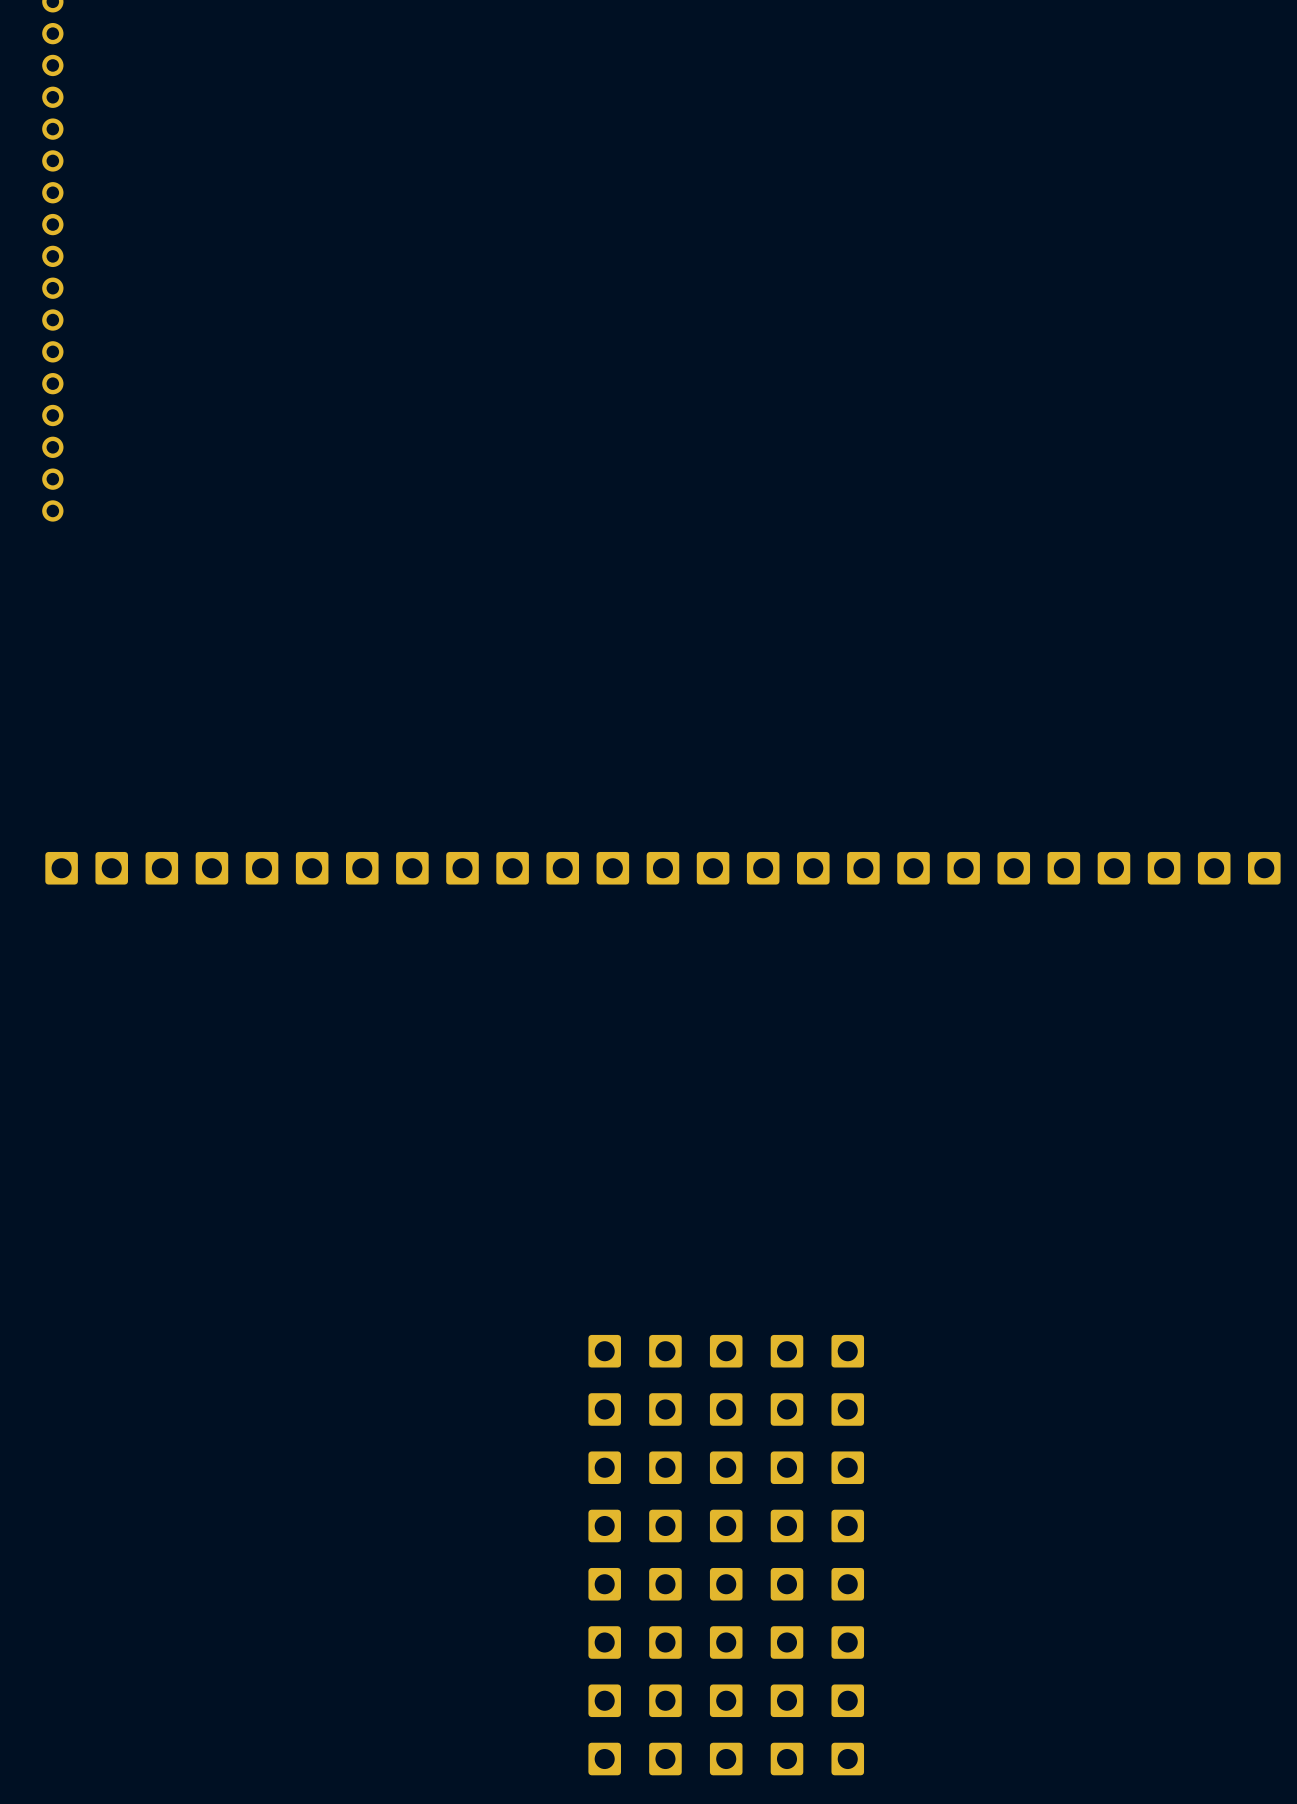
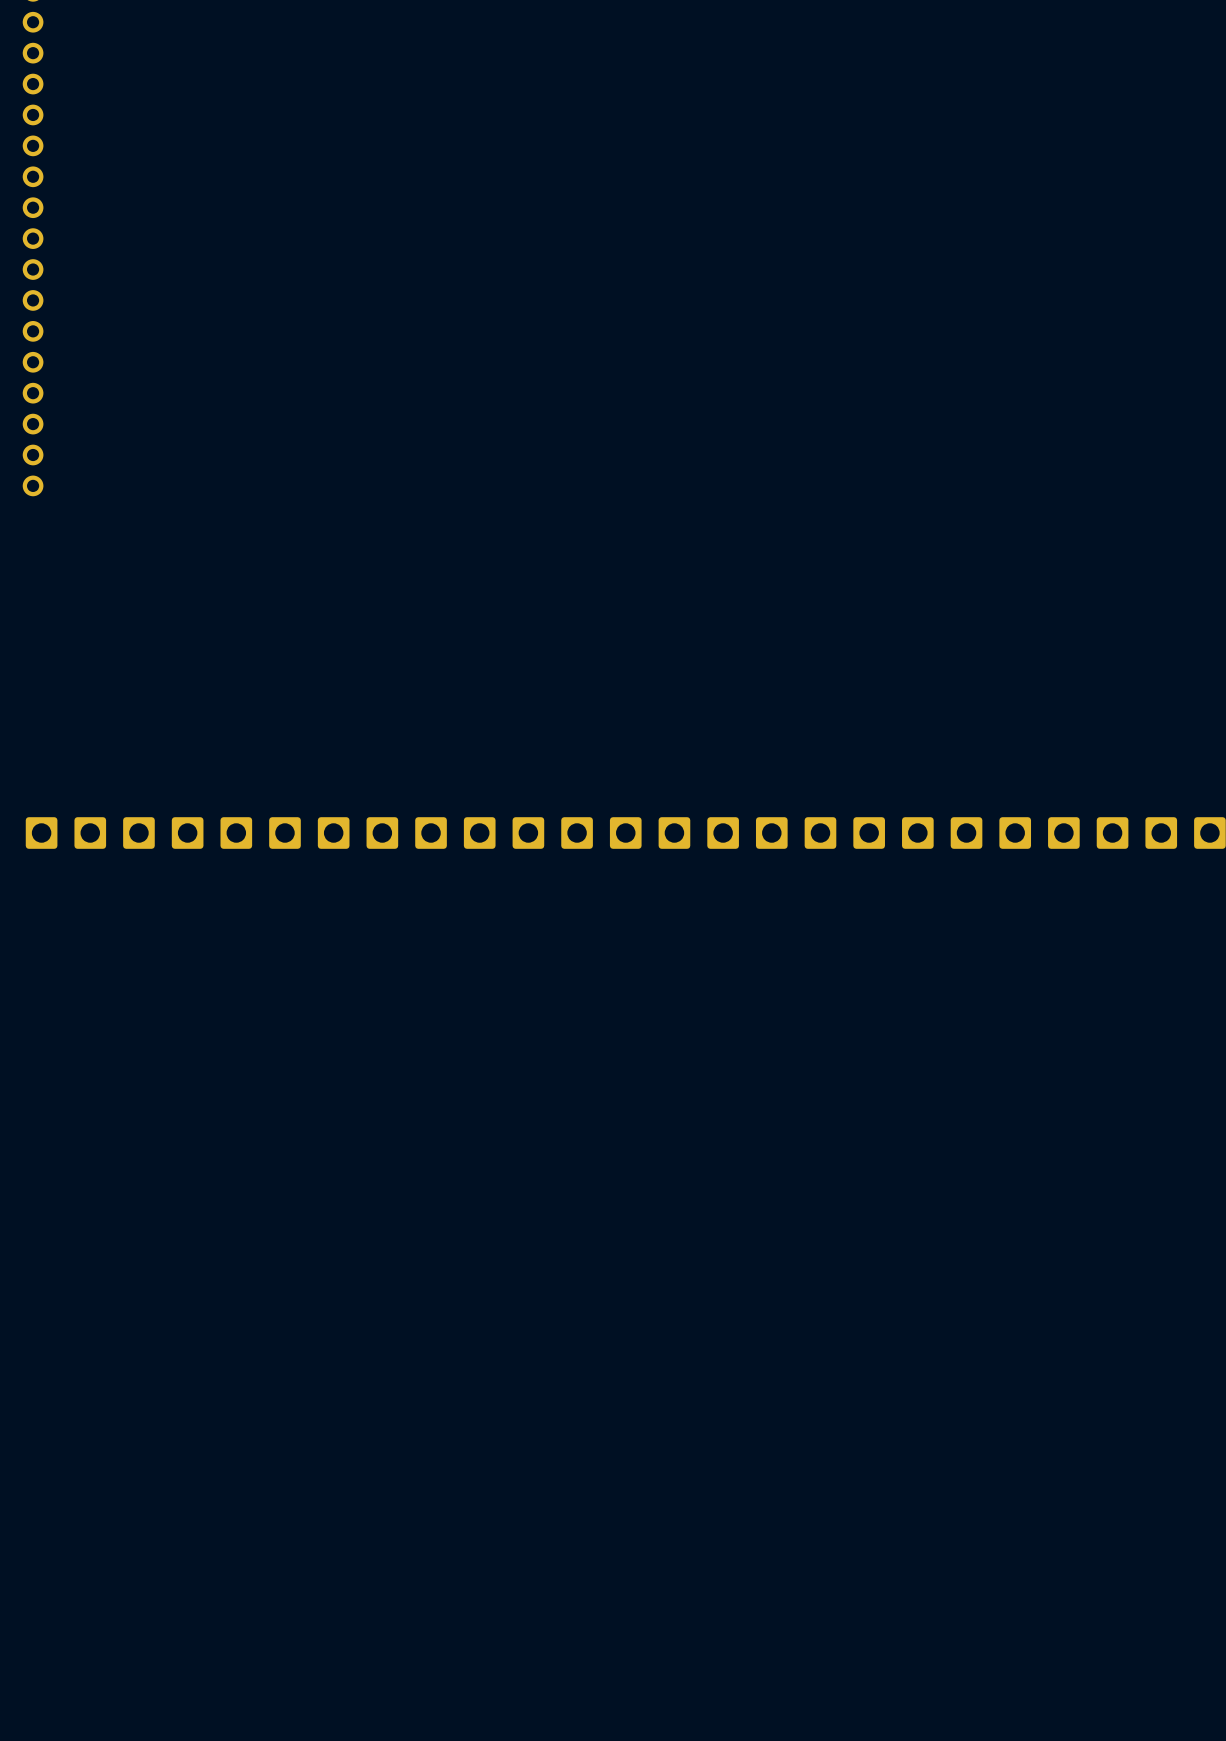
part: (604, 1351) -> none
part: (665, 1351) -> none
part: (726, 1351) -> none
part: (786, 1351) -> none
part: (847, 1351) -> none
part: (604, 1409) -> none
part: (665, 1409) -> none
part: (726, 1409) -> none
part: (786, 1409) -> none
part: (847, 1409) -> none
part: (604, 1467) -> none
part: (665, 1467) -> none
part: (726, 1467) -> none
part: (786, 1467) -> none
part: (847, 1467) -> none
part: (604, 1525) -> none
part: (665, 1525) -> none
part: (726, 1525) -> none
part: (786, 1525) -> none
part: (847, 1525) -> none
part: (604, 1584) -> none
part: (665, 1584) -> none
part: (726, 1584) -> none
part: (786, 1584) -> none
part: (847, 1584) -> none
part: (604, 1642) -> none
part: (665, 1642) -> none
part: (726, 1642) -> none
part: (786, 1642) -> none
part: (847, 1642) -> none
part: (604, 1700) -> none
part: (665, 1700) -> none
part: (726, 1700) -> none
part: (786, 1700) -> none
part: (847, 1700) -> none
part: (604, 1759) -> none
part: (665, 1759) -> none
part: (726, 1759) -> none
part: (786, 1759) -> none
part: (847, 1759) -> none

